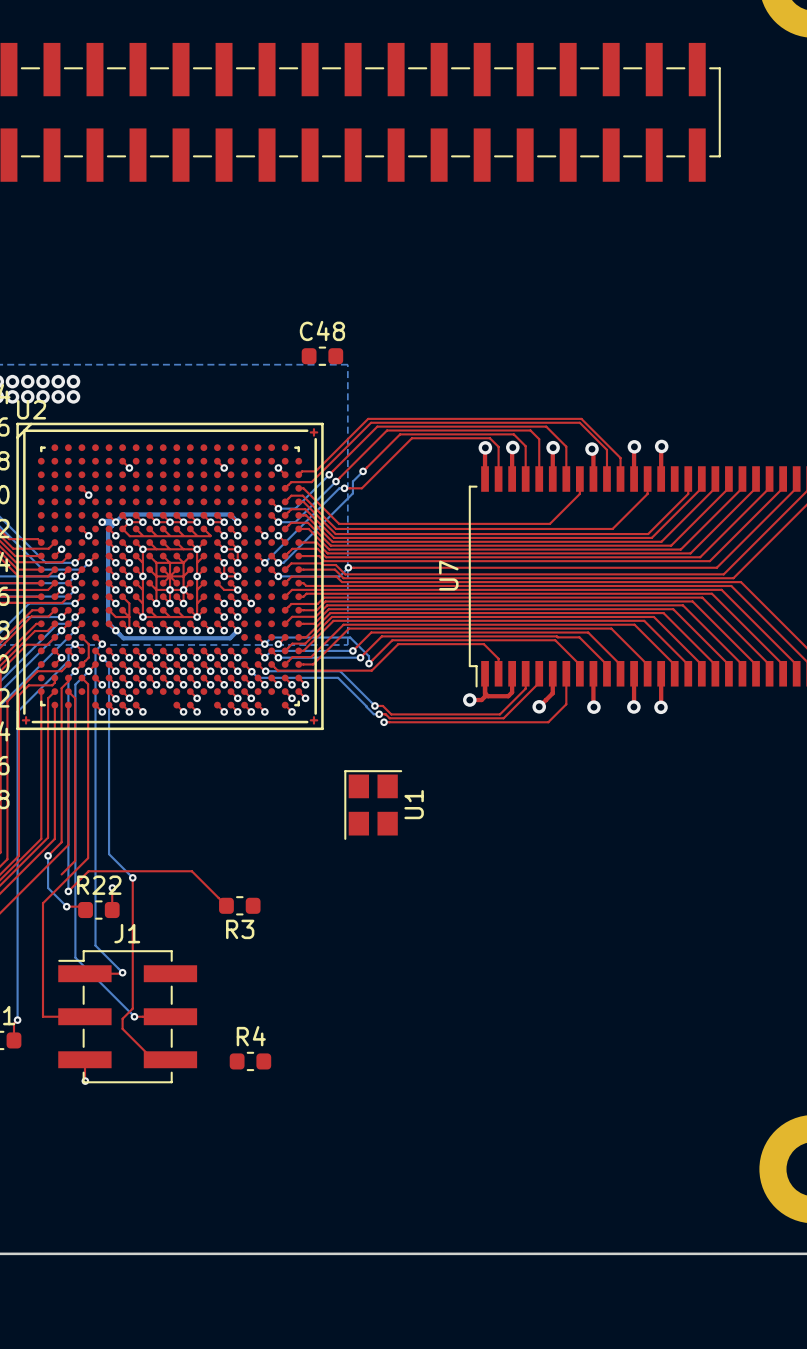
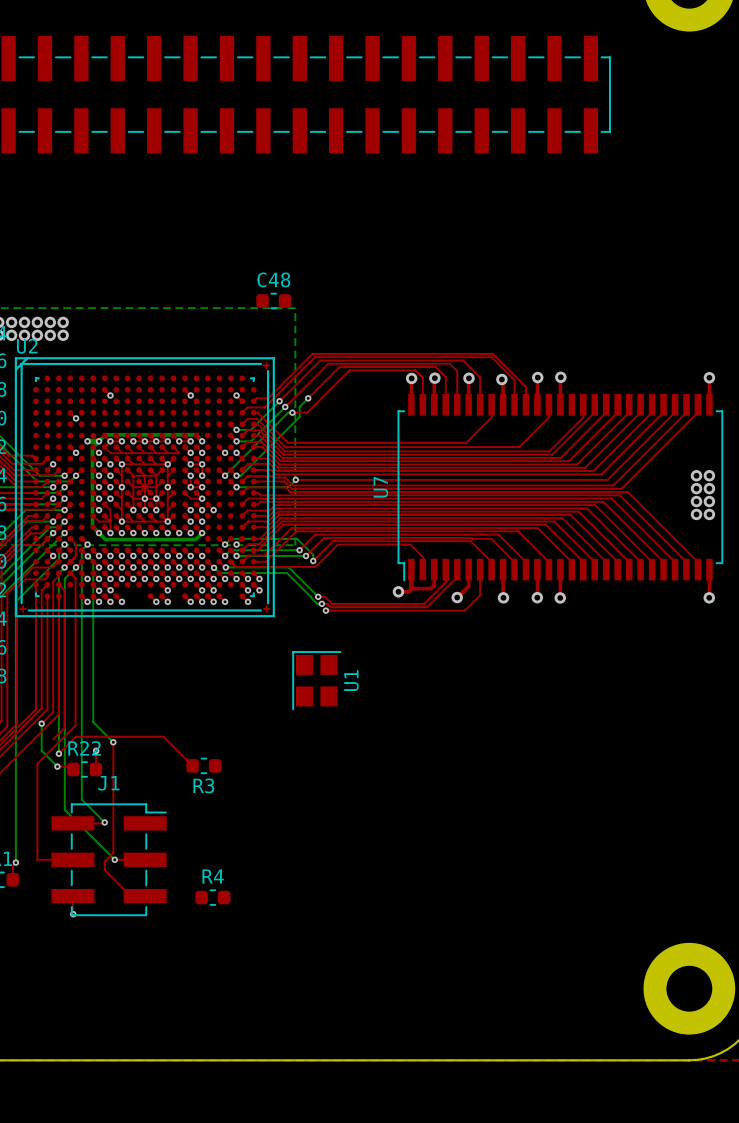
J1 footprint: [58, 950, 198, 1084] -> [51, 803, 167, 917]

